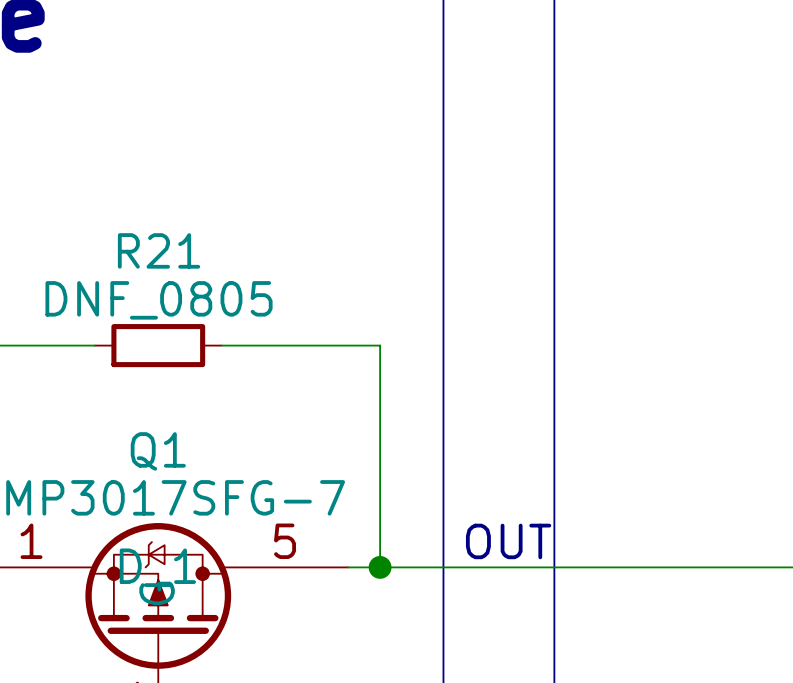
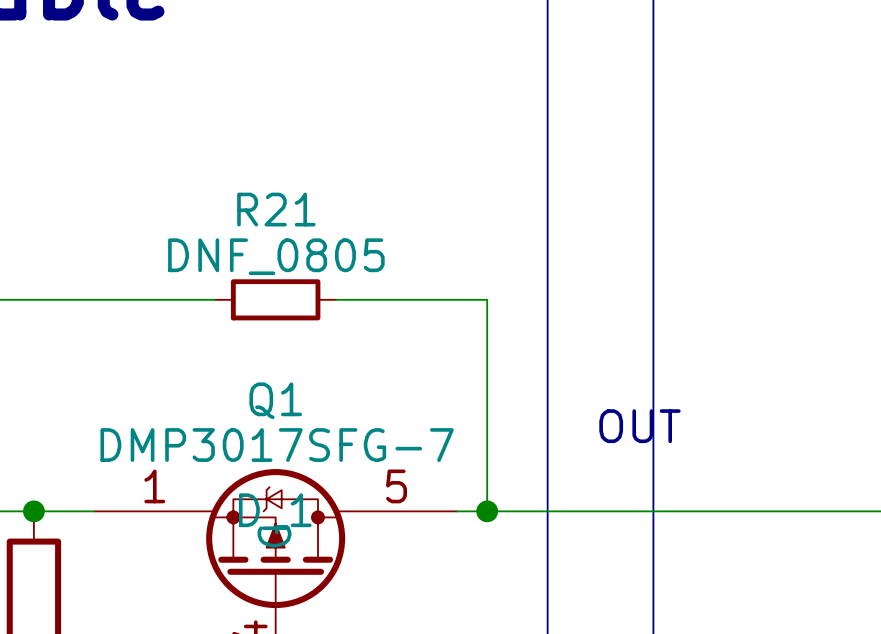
text position: OUT (508, 541) -> OUT (639, 426)

